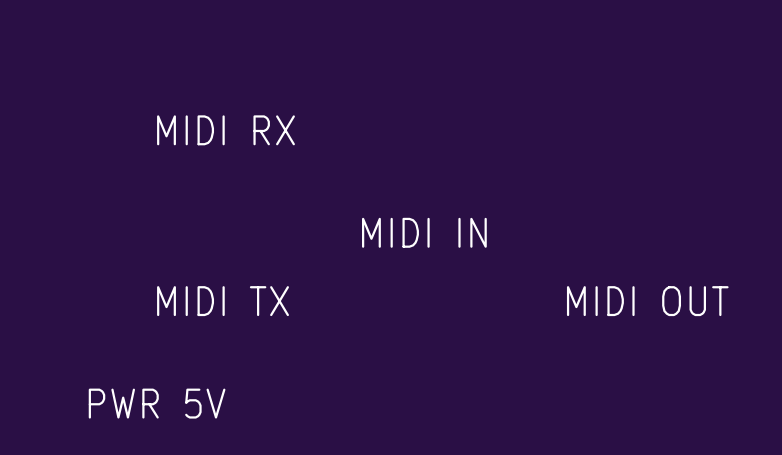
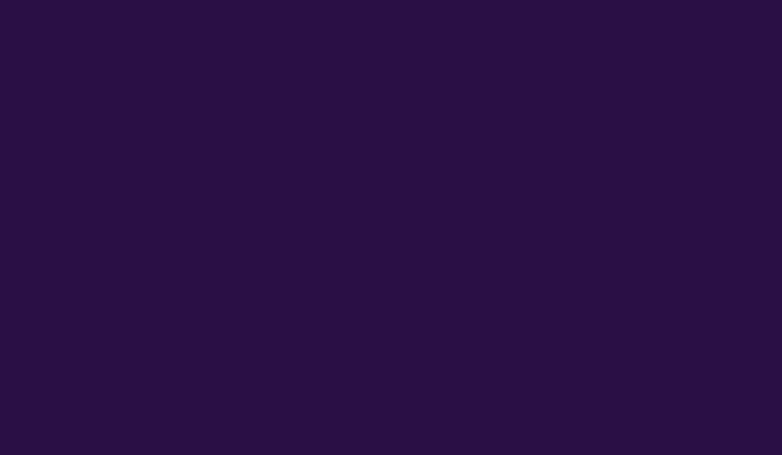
text: MIDI RX (225, 130) -> none
text: MIDI IN (424, 232) -> none
text: MIDI TX (223, 301) -> none
text: MIDI OUT (647, 301) -> none
text: PWR 5V (157, 403) -> none

